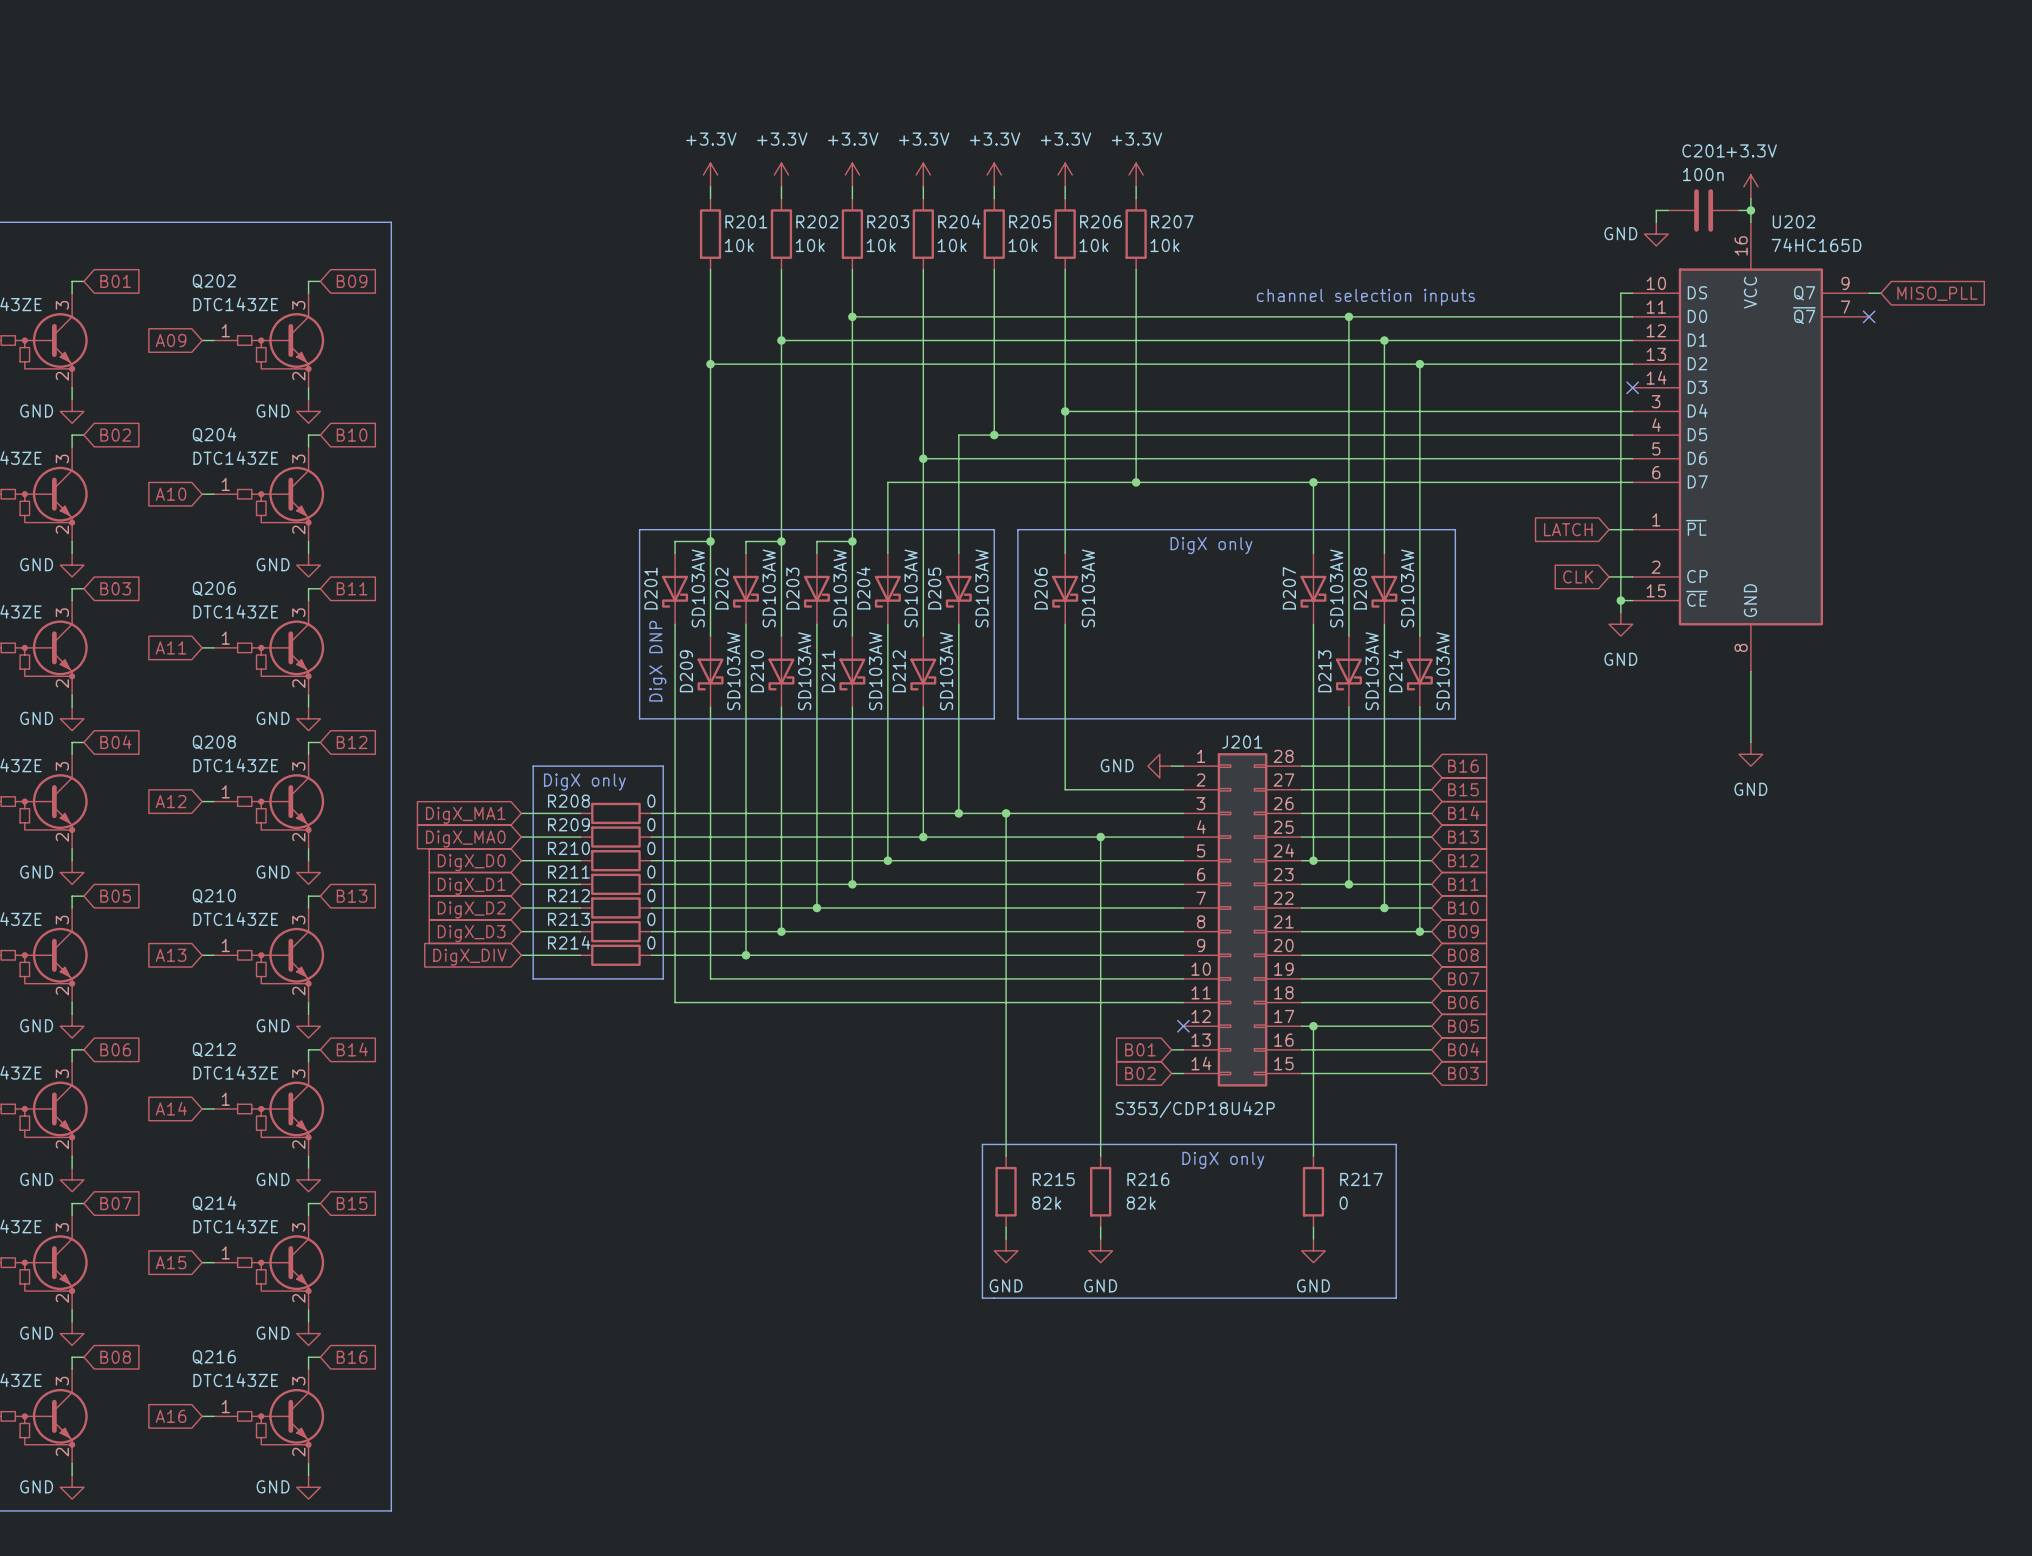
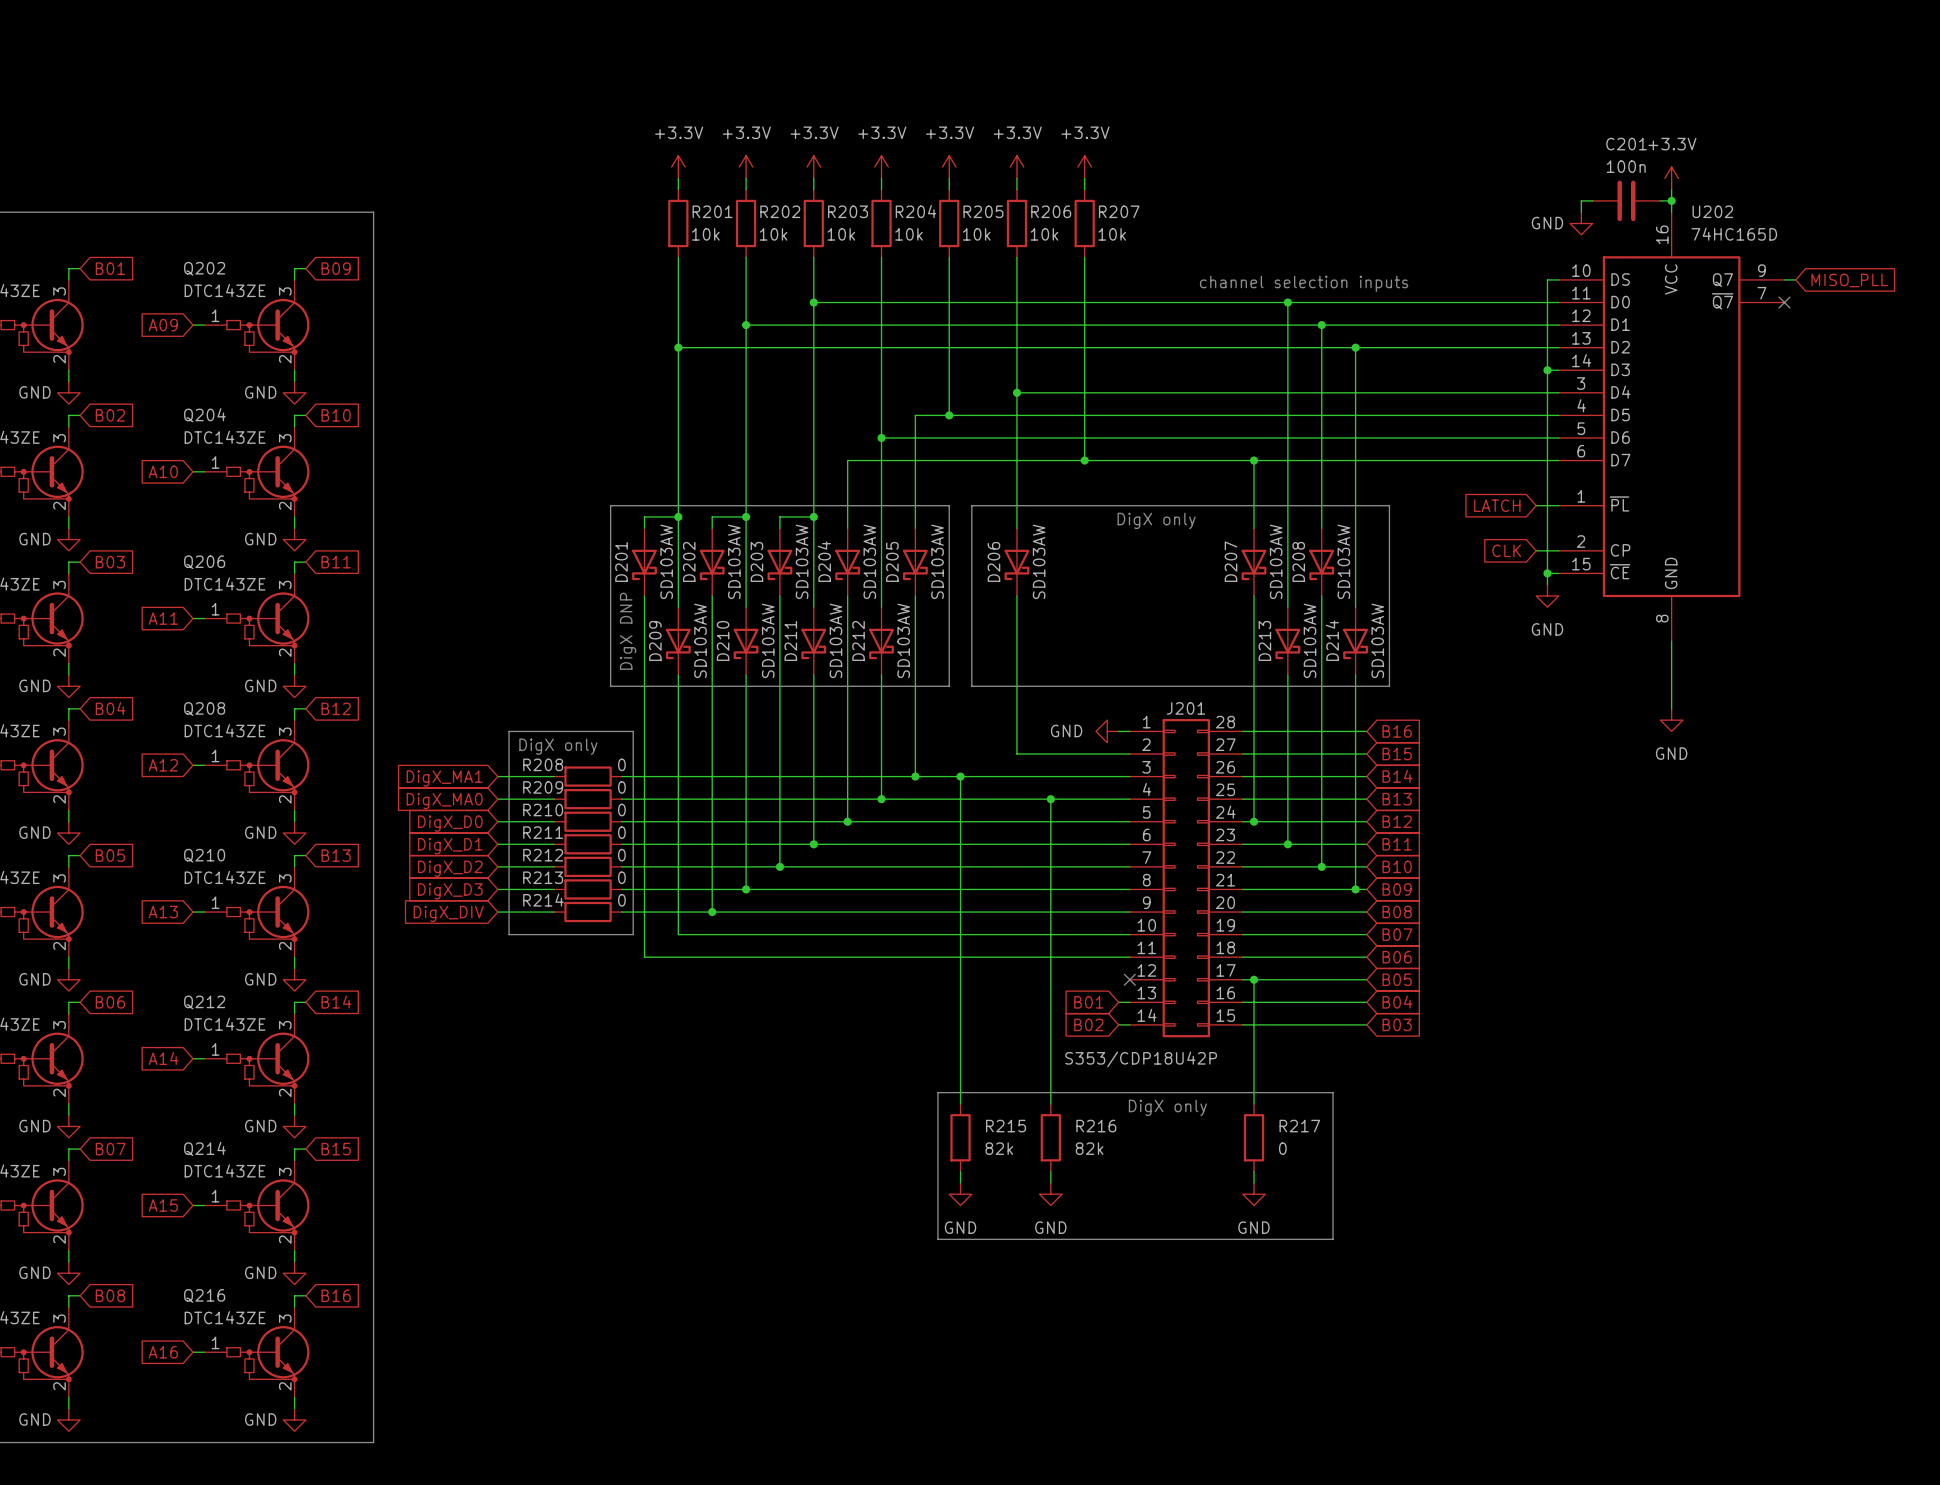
wire: none -> (1547, 370) (1558, 370)
junction: none -> (1547, 370)
no-connect mark: (1632, 387) -> none

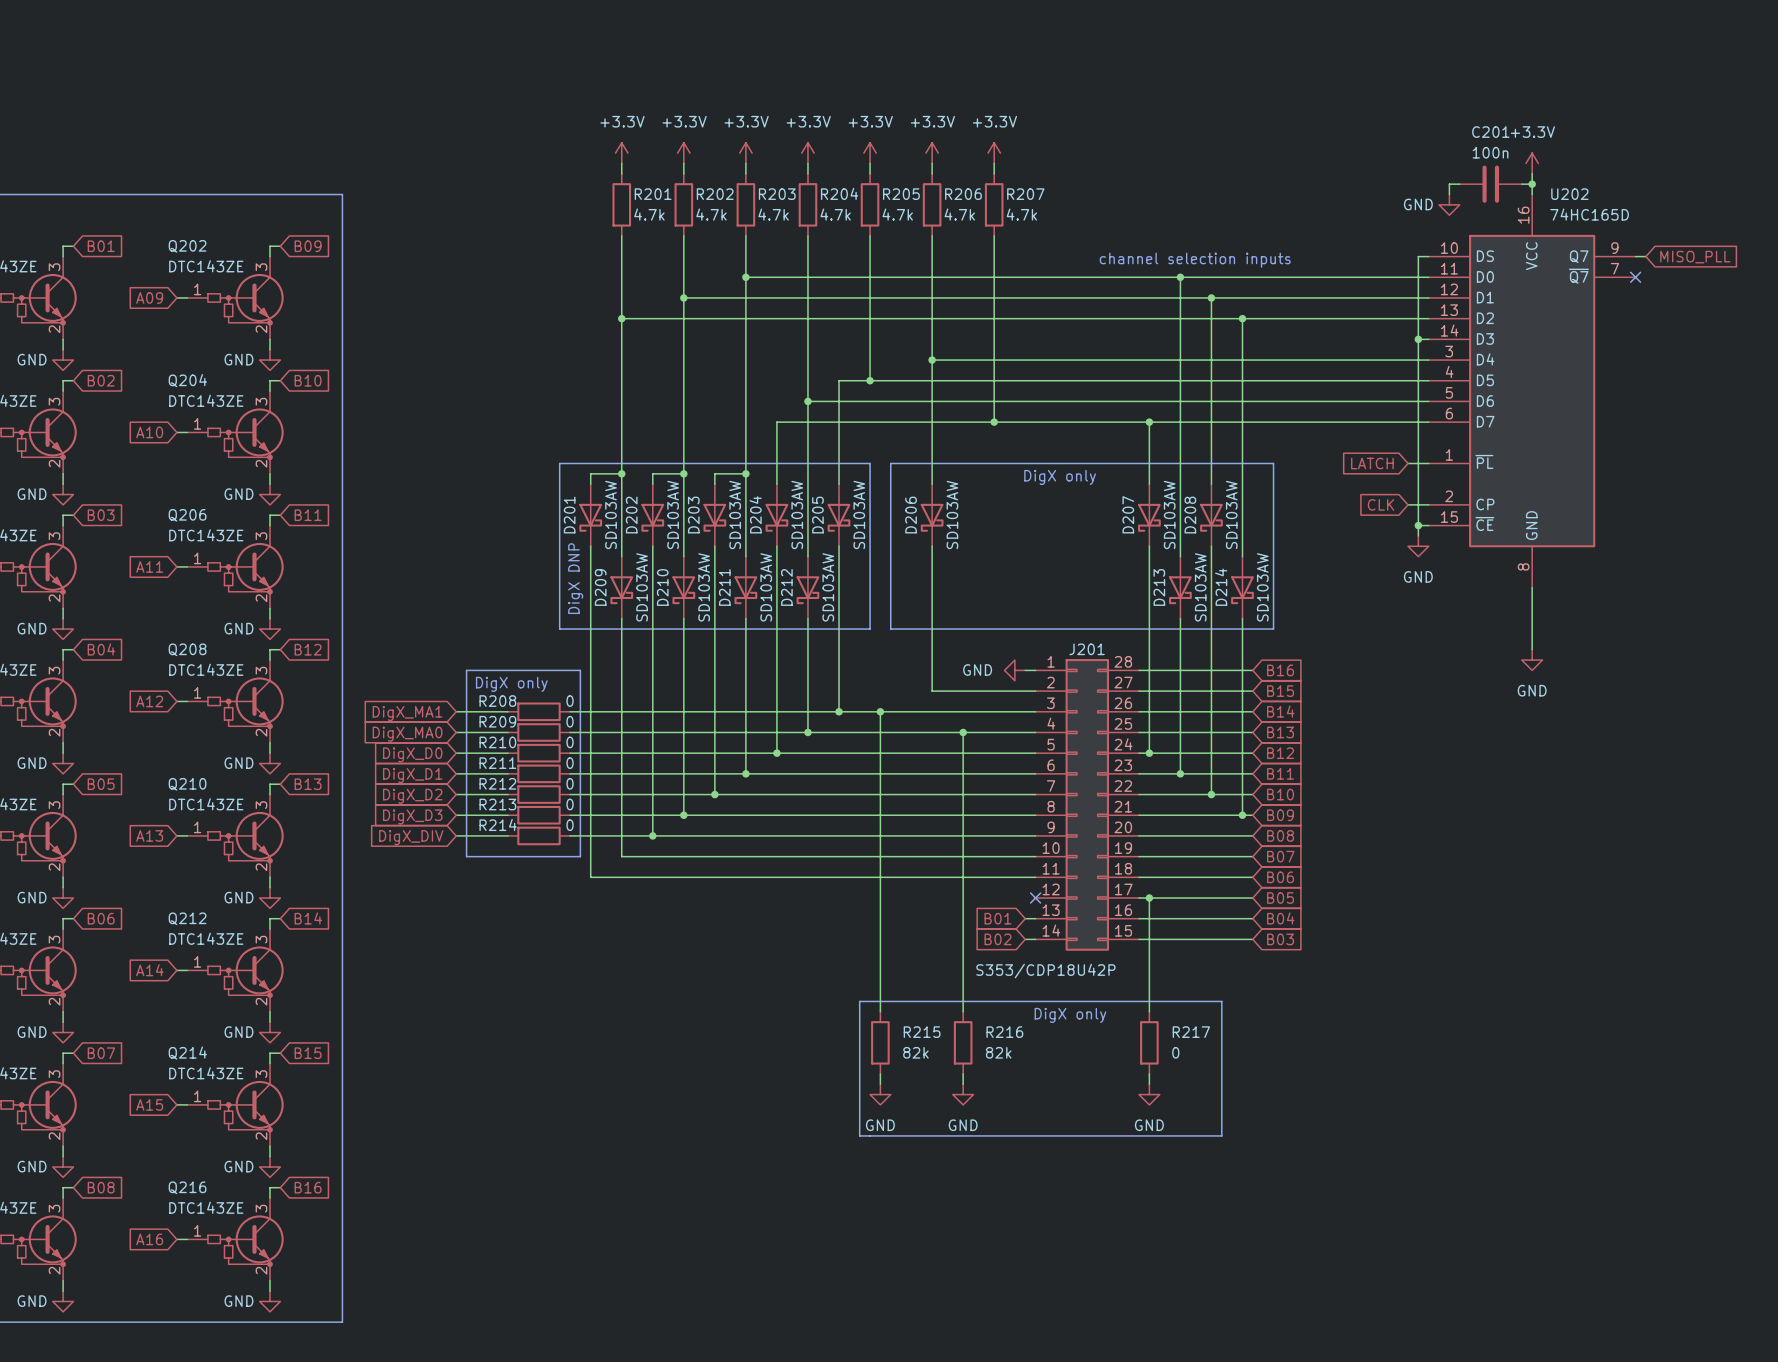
R201 value: 10k (705, 234) -> 4.7k (649, 214)
R202 value: 10k (773, 234) -> 4.7k (711, 214)
R203 value: 10k (841, 234) -> 4.7k (773, 214)
R204 value: 10k (909, 234) -> 4.7k (835, 214)
R205 value: 10k (976, 234) -> 4.7k (897, 214)
R206 value: 10k (1044, 234) -> 4.7k (959, 214)
R207 value: 10k (1112, 234) -> 4.7k (1021, 214)

